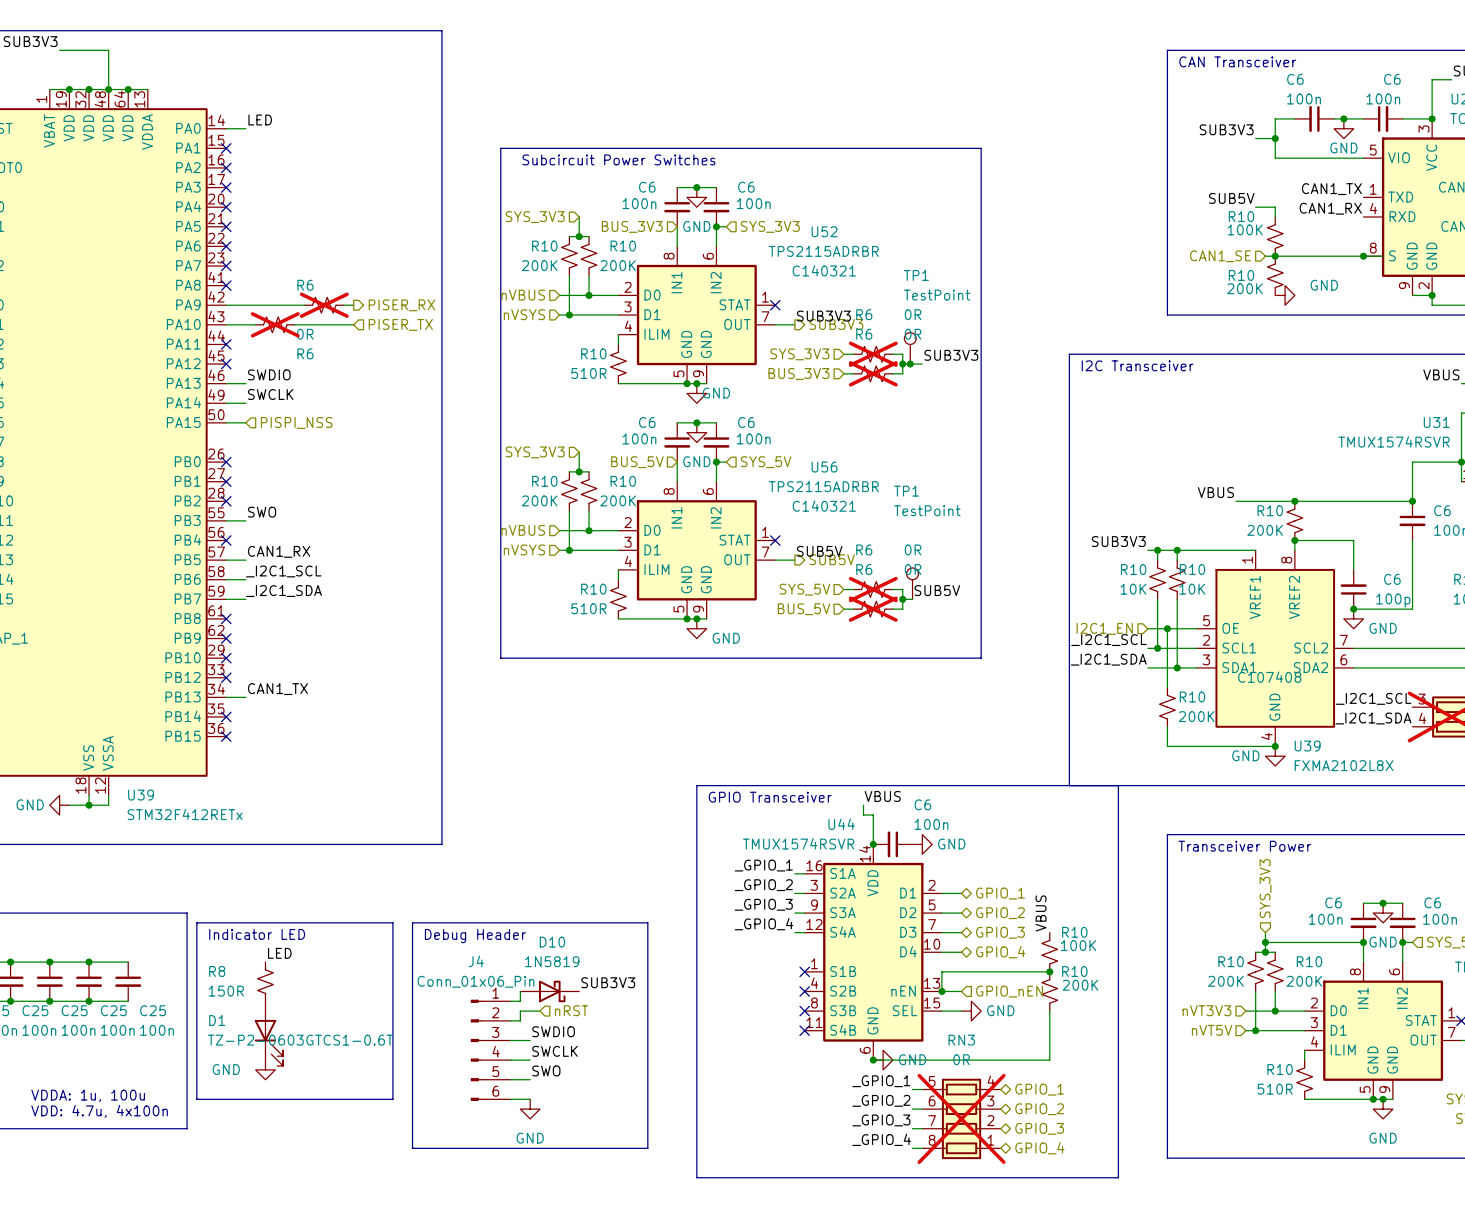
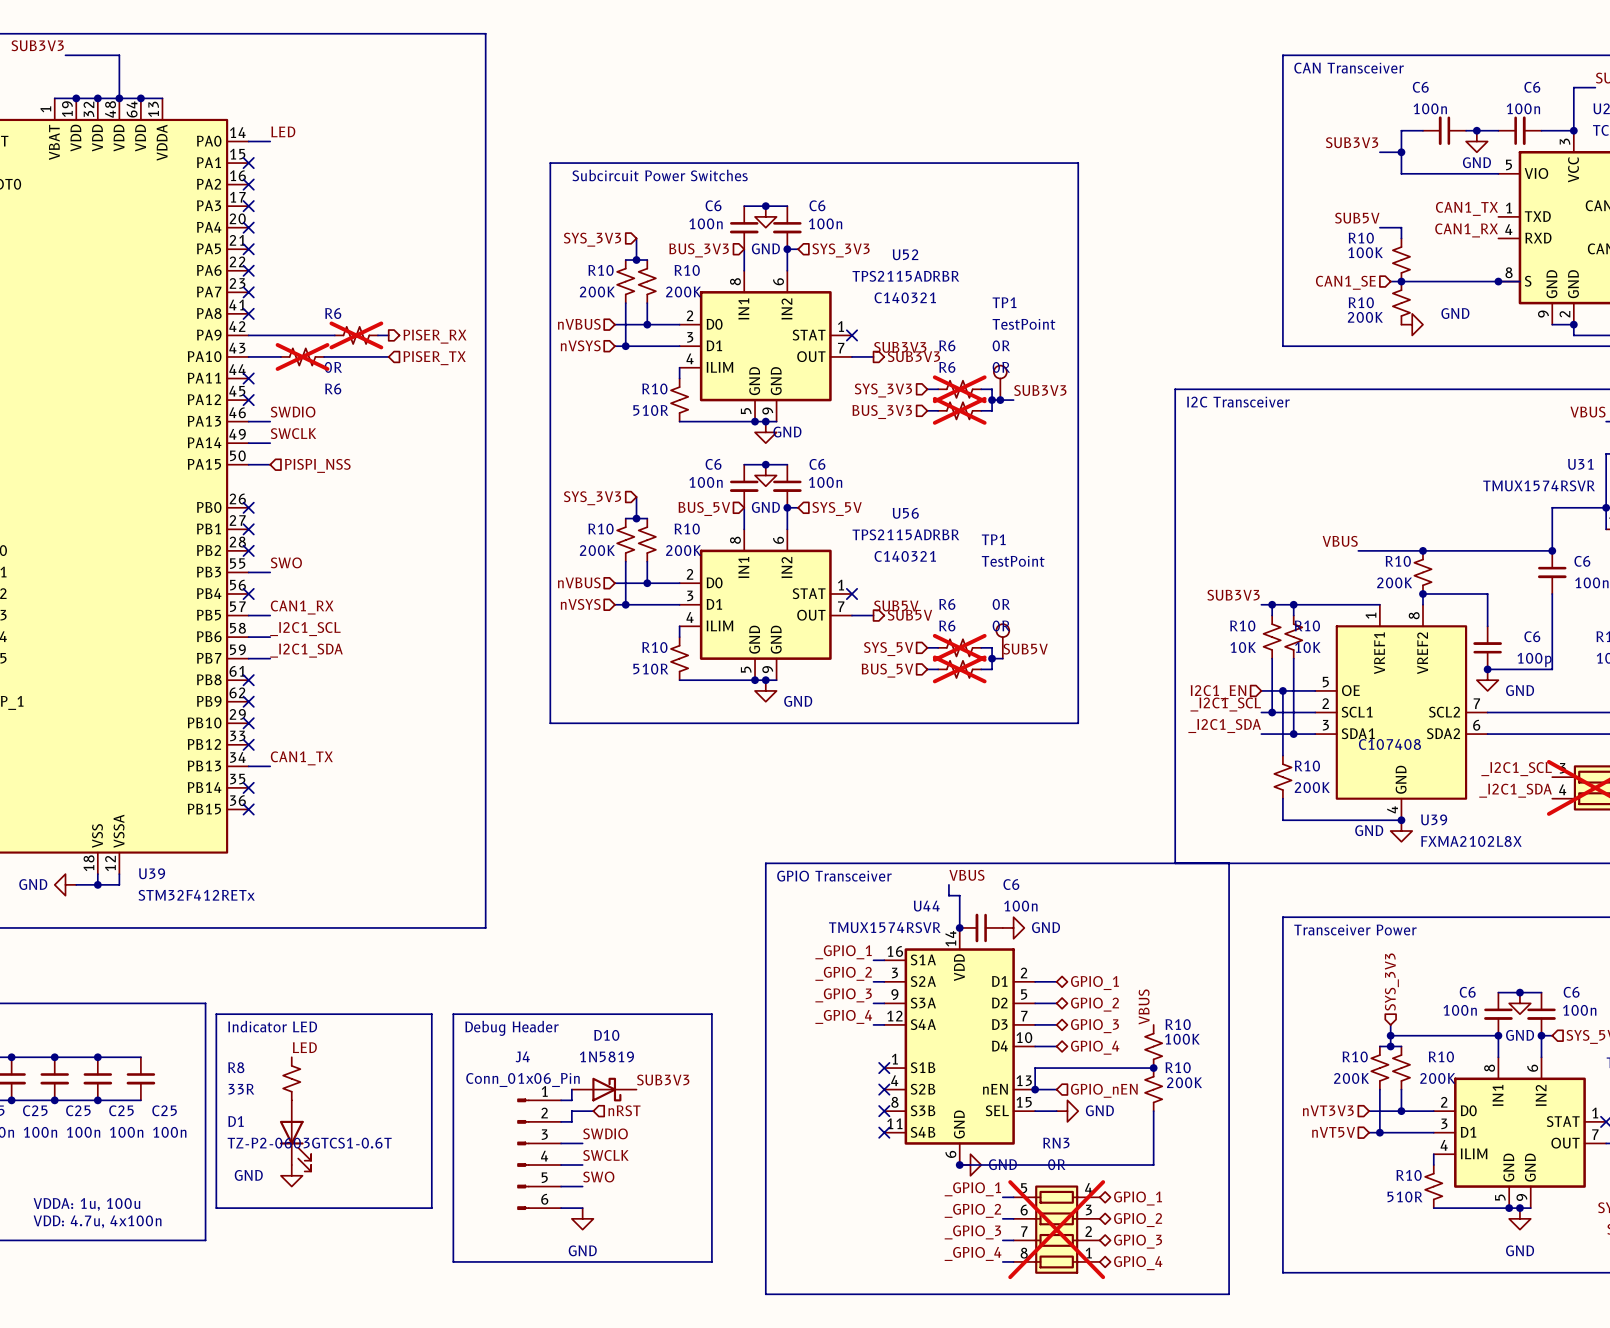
R8 value: 150R (226, 991) -> 33R (241, 1089)

